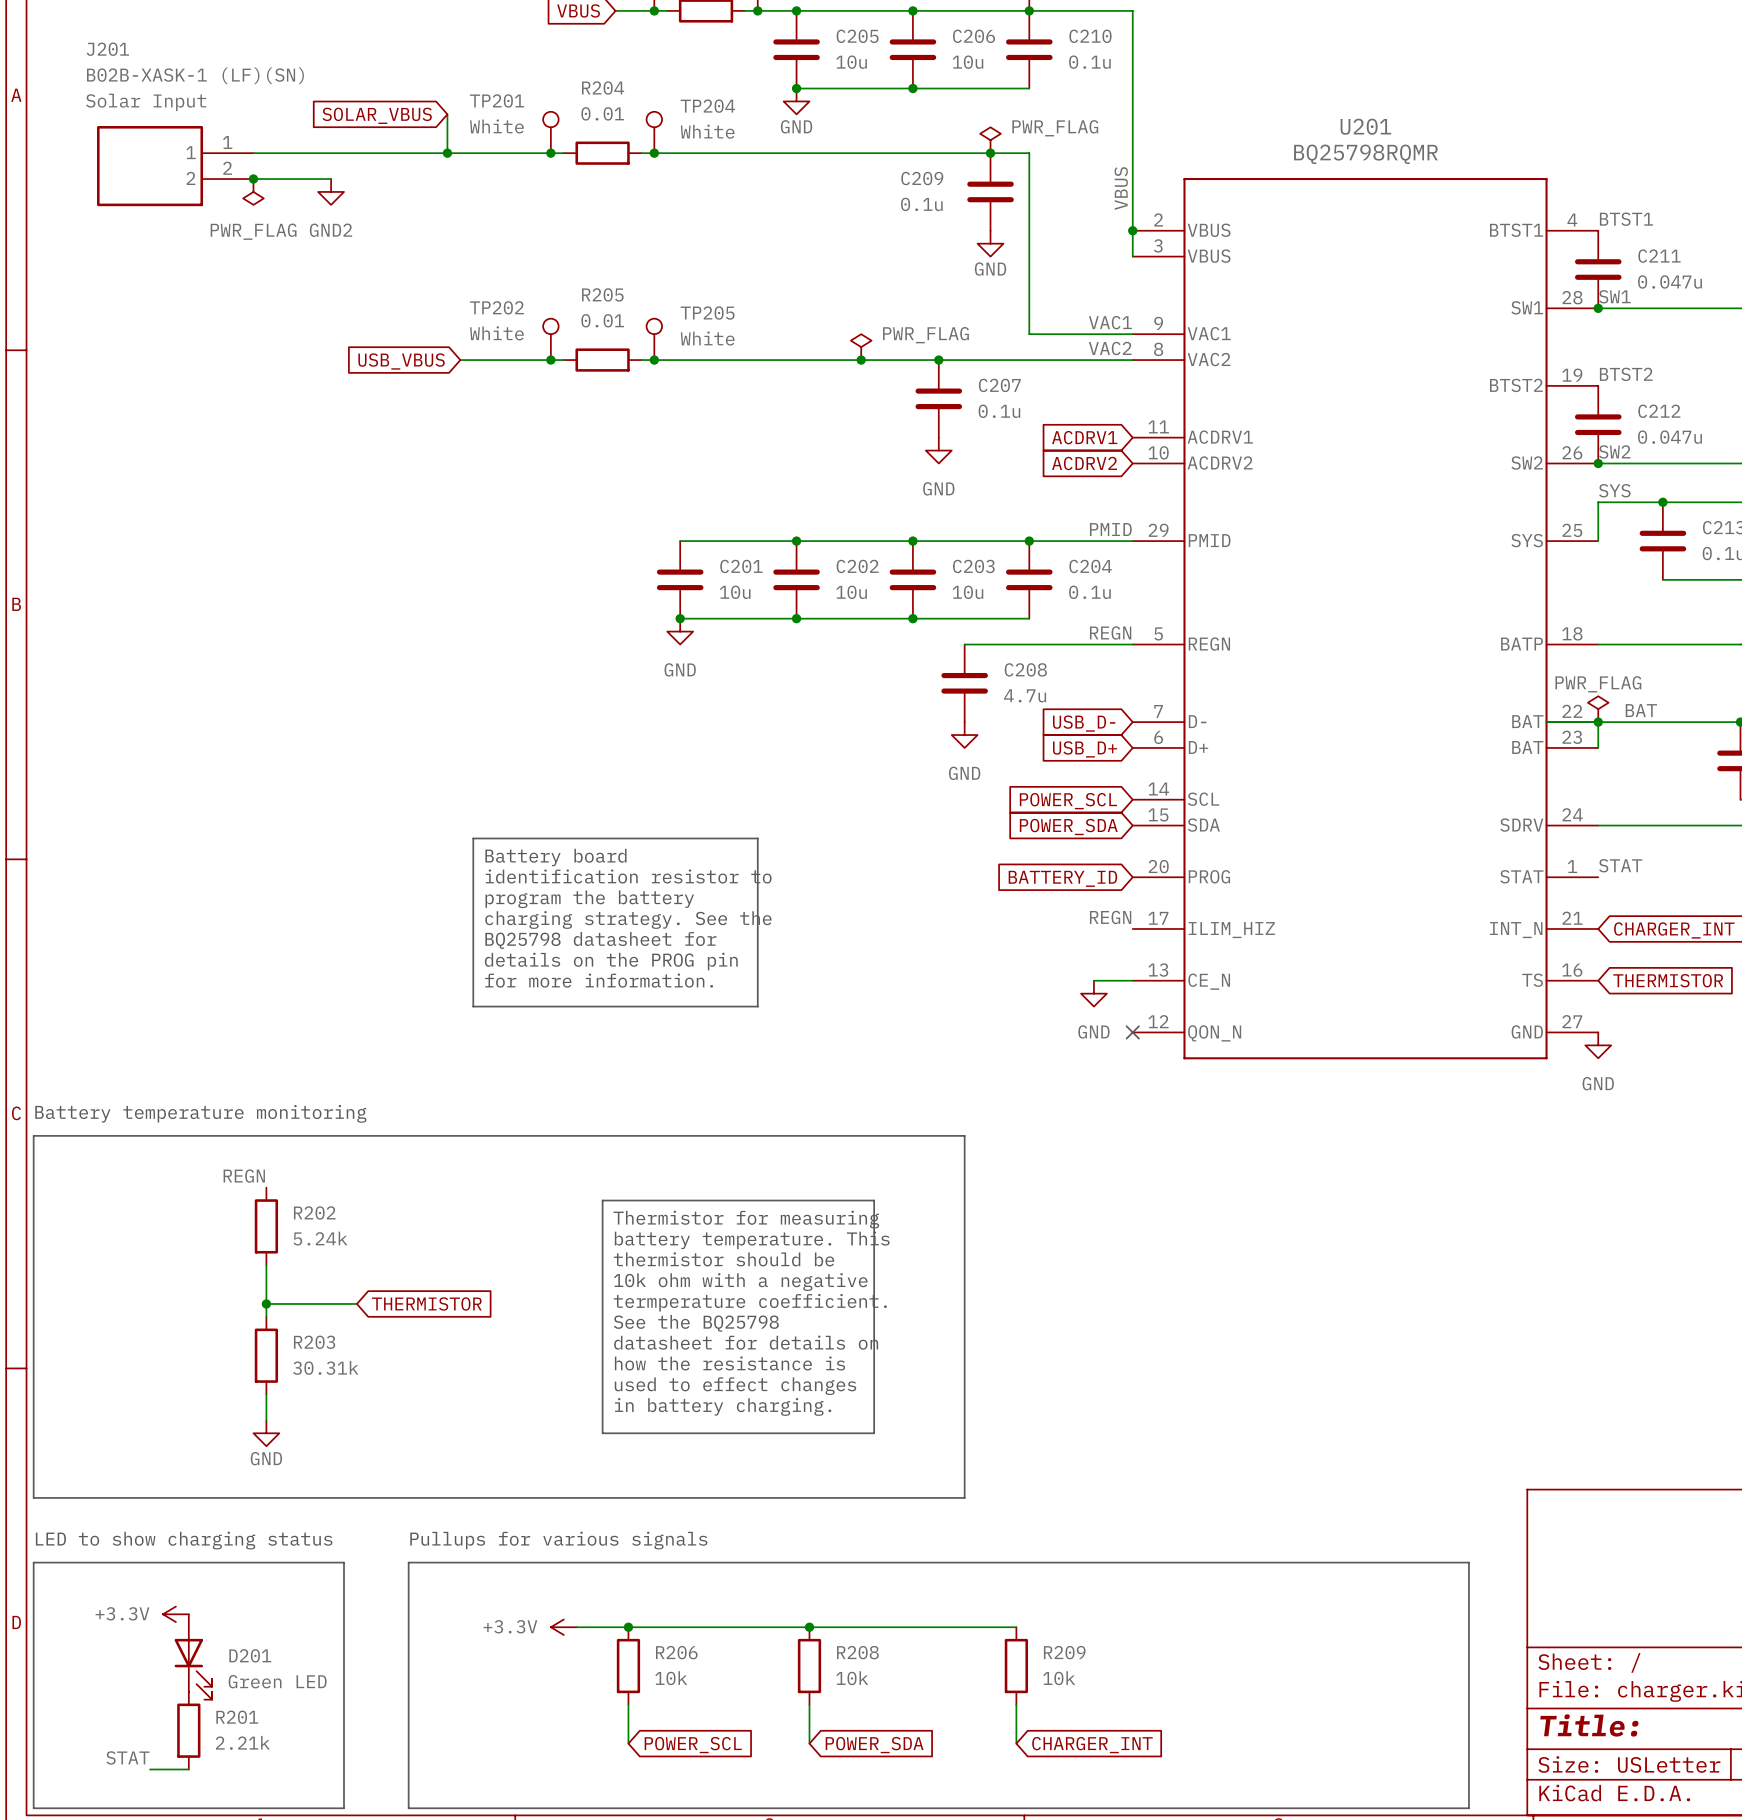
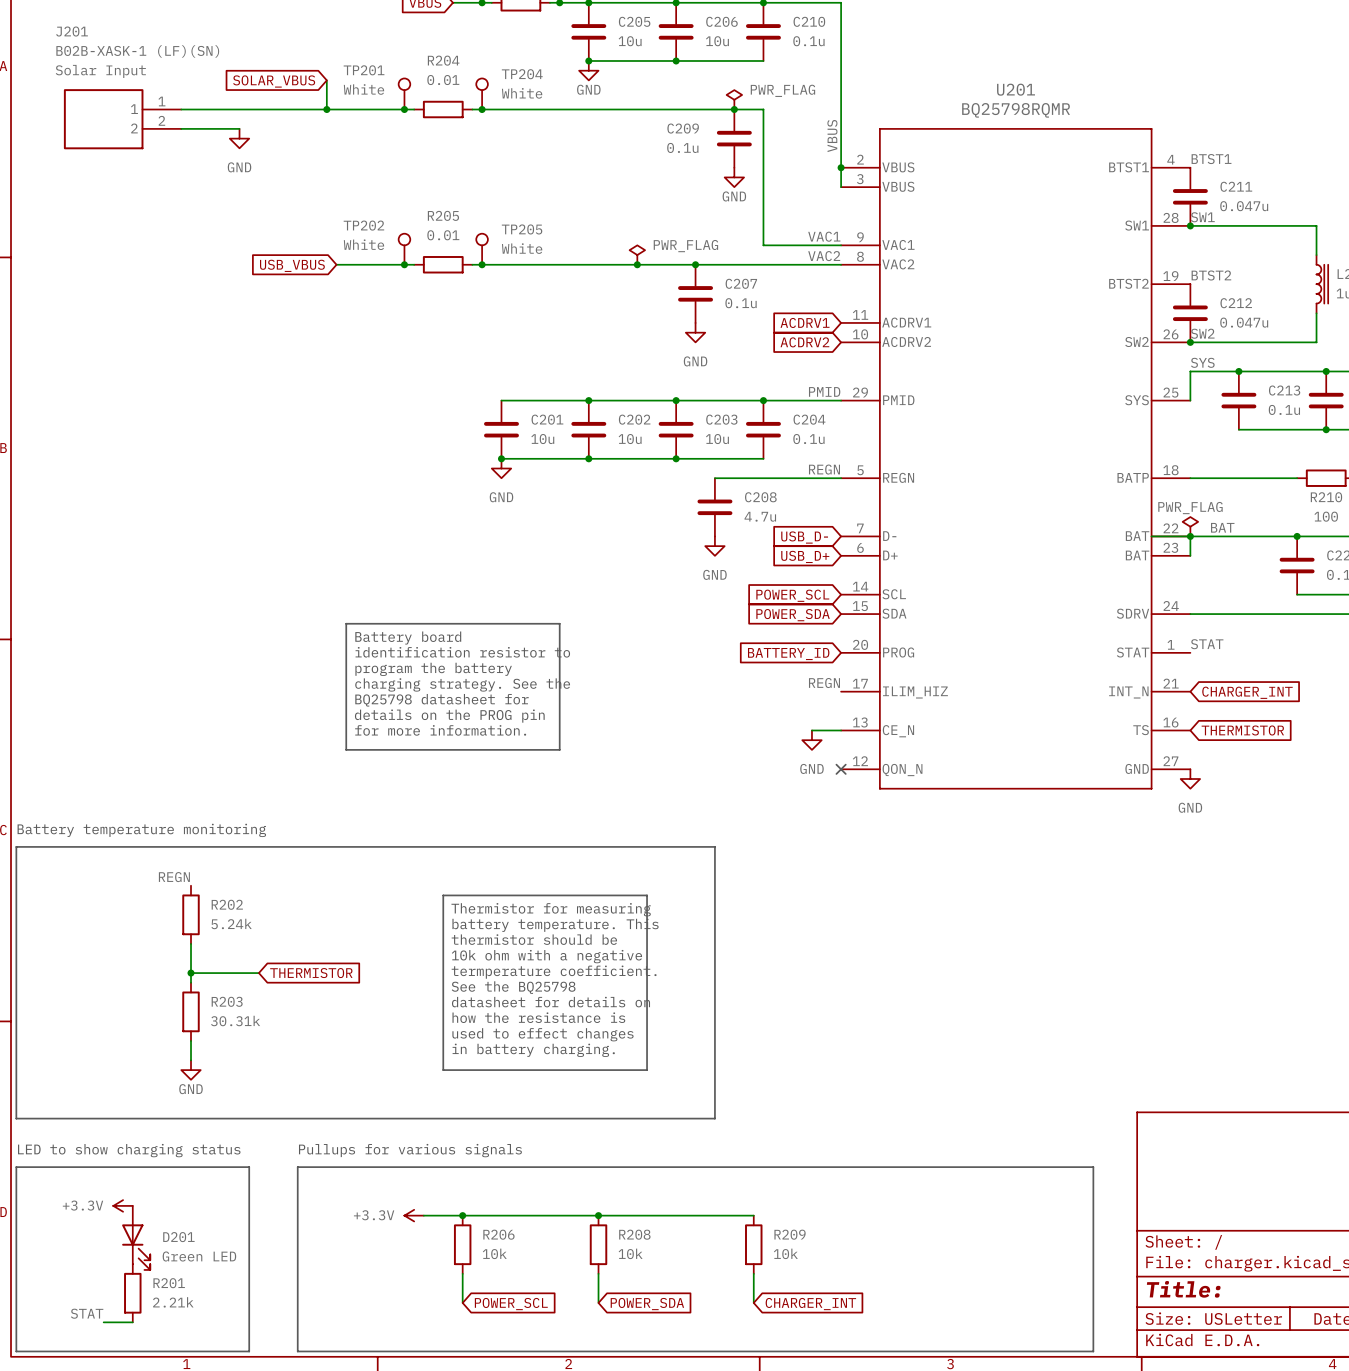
junction: (253, 179) -> none
power symbol: PWR_FLAG (253, 191) -> none
power symbol: GND2 (331, 191) -> GND (239, 138)

